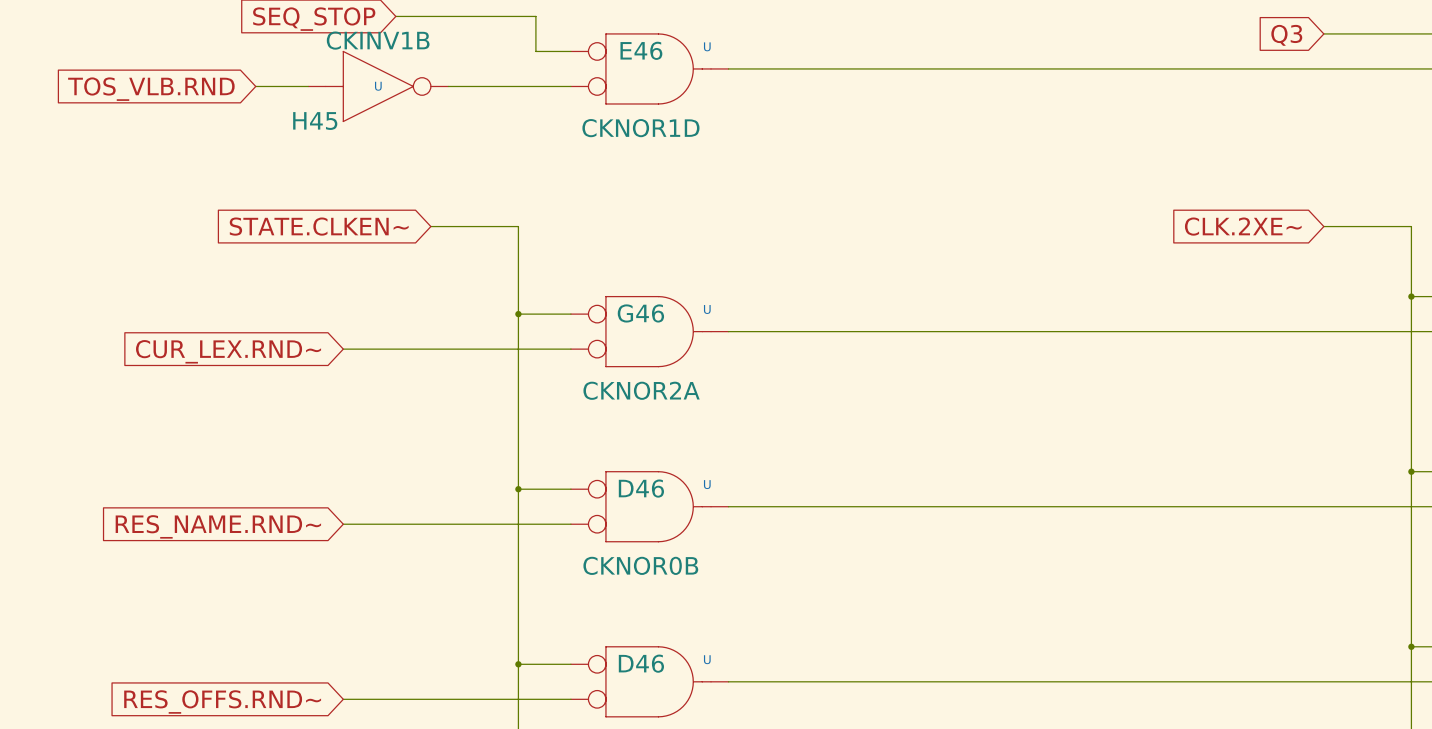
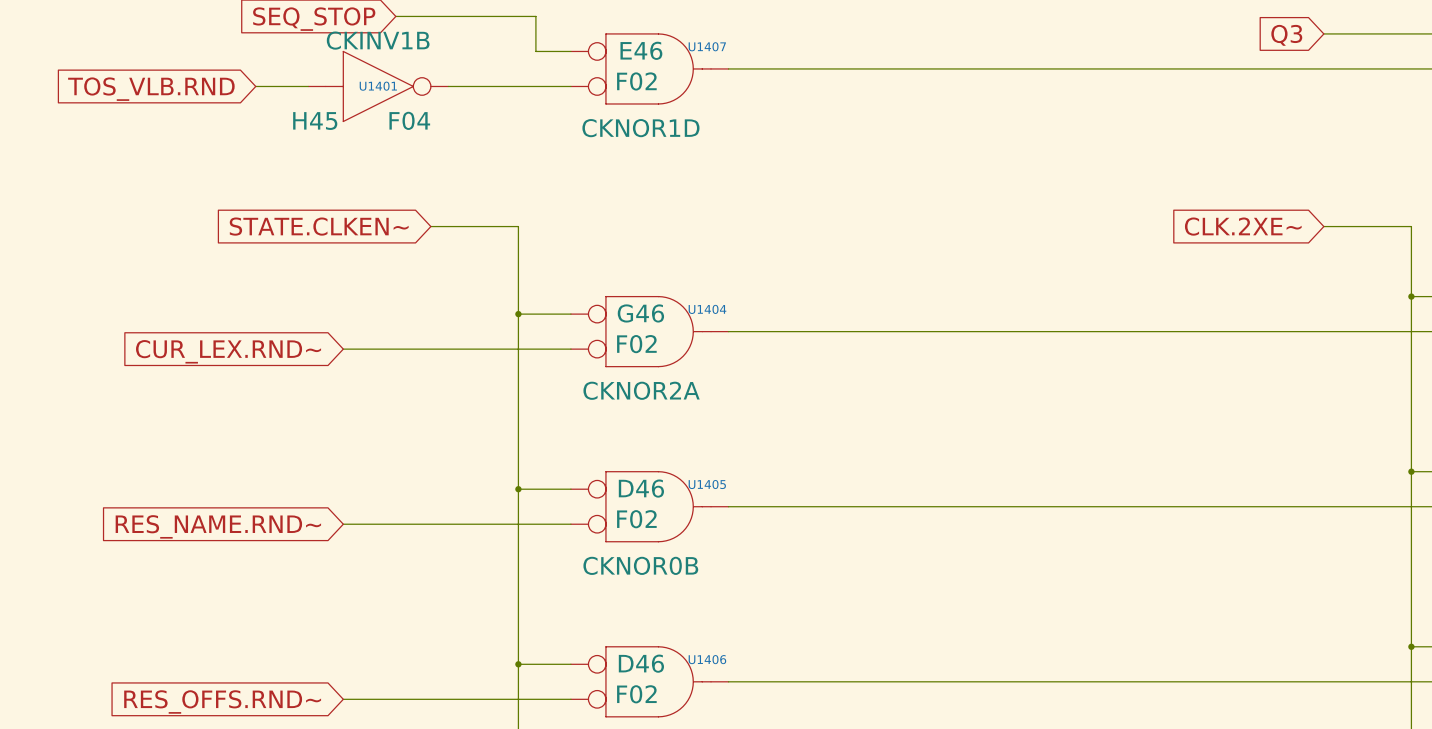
U name: U (707, 46) -> U1407 (707, 46)
U value: none -> F02 (636, 81)
U name: U (378, 86) -> U1401 (378, 86)
U value: none -> F04 (409, 120)
U name: U (707, 309) -> U1404 (707, 309)
U value: none -> F02 (636, 344)
U name: U (707, 484) -> U1405 (707, 484)
U value: none -> F02 (636, 519)
U name: U (707, 659) -> U1406 (707, 659)
U value: none -> F02 (636, 694)

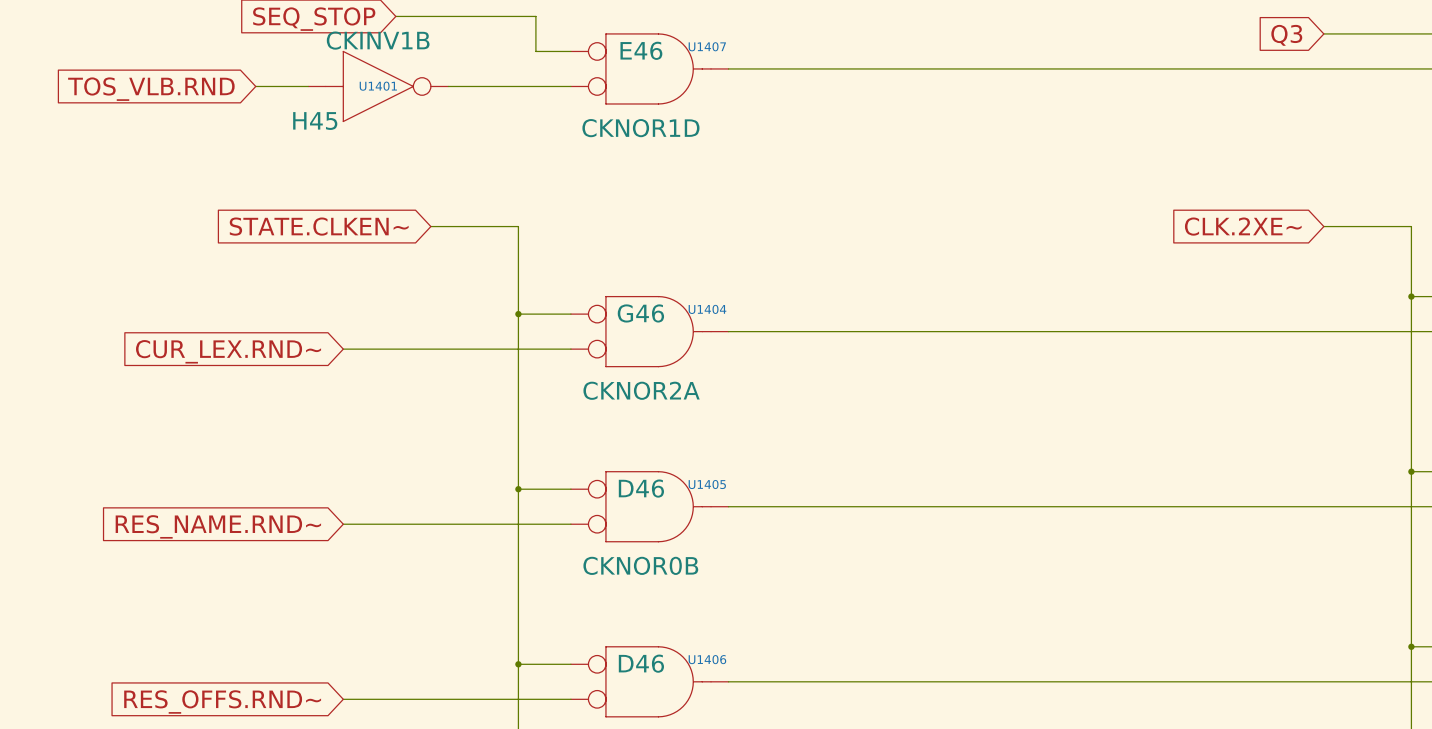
U1407 value: F02 (636, 81) -> none
U1401 value: F04 (409, 120) -> none
U1404 value: F02 (636, 344) -> none
U1405 value: F02 (636, 519) -> none
U1406 value: F02 (636, 694) -> none

